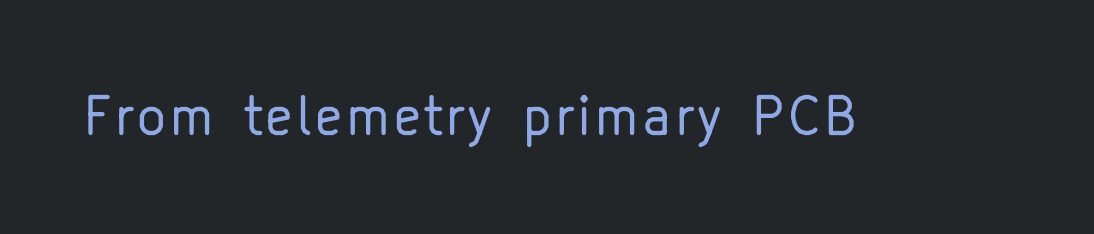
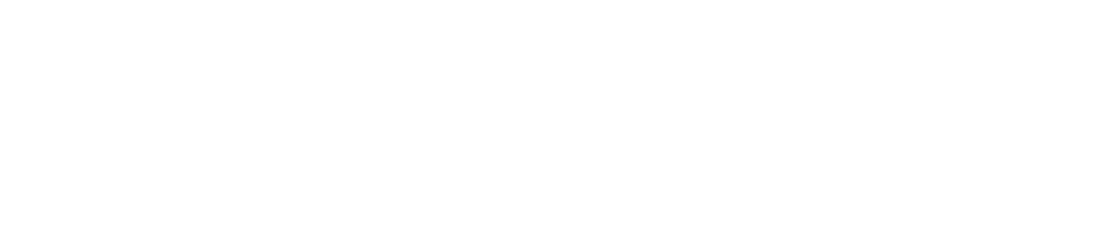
text: From telemetry primary PCB (470, 120) -> none

